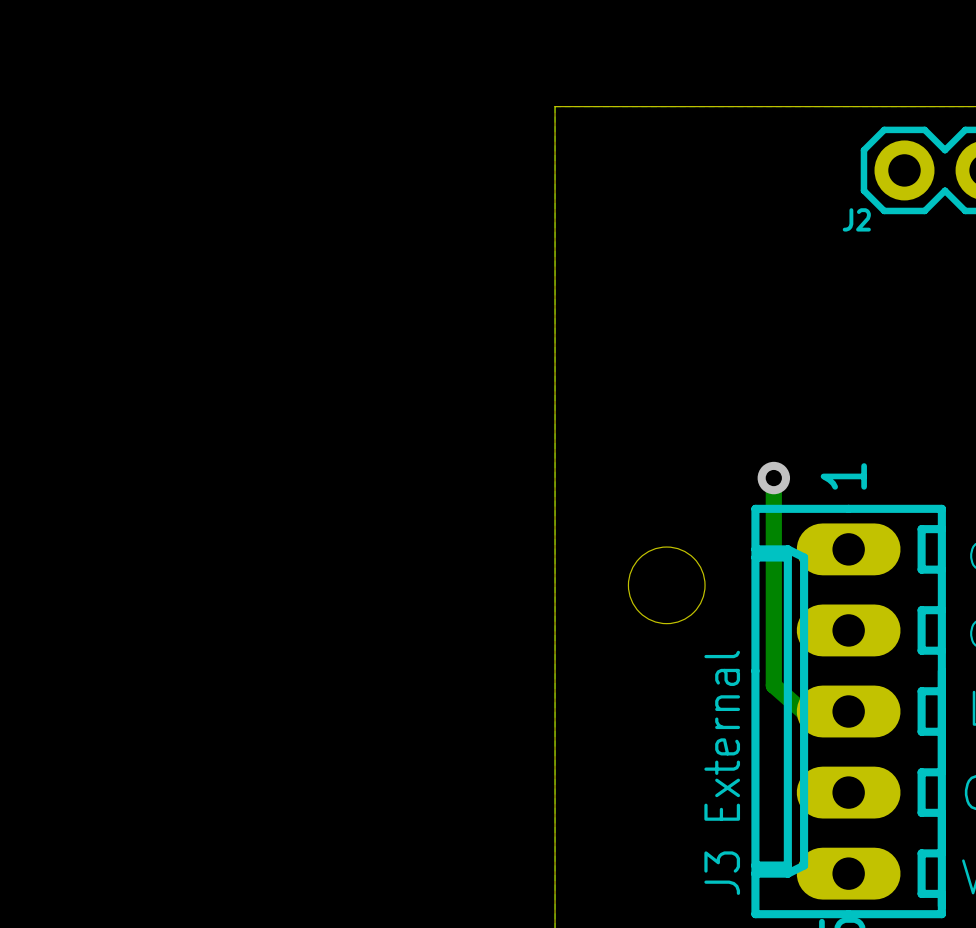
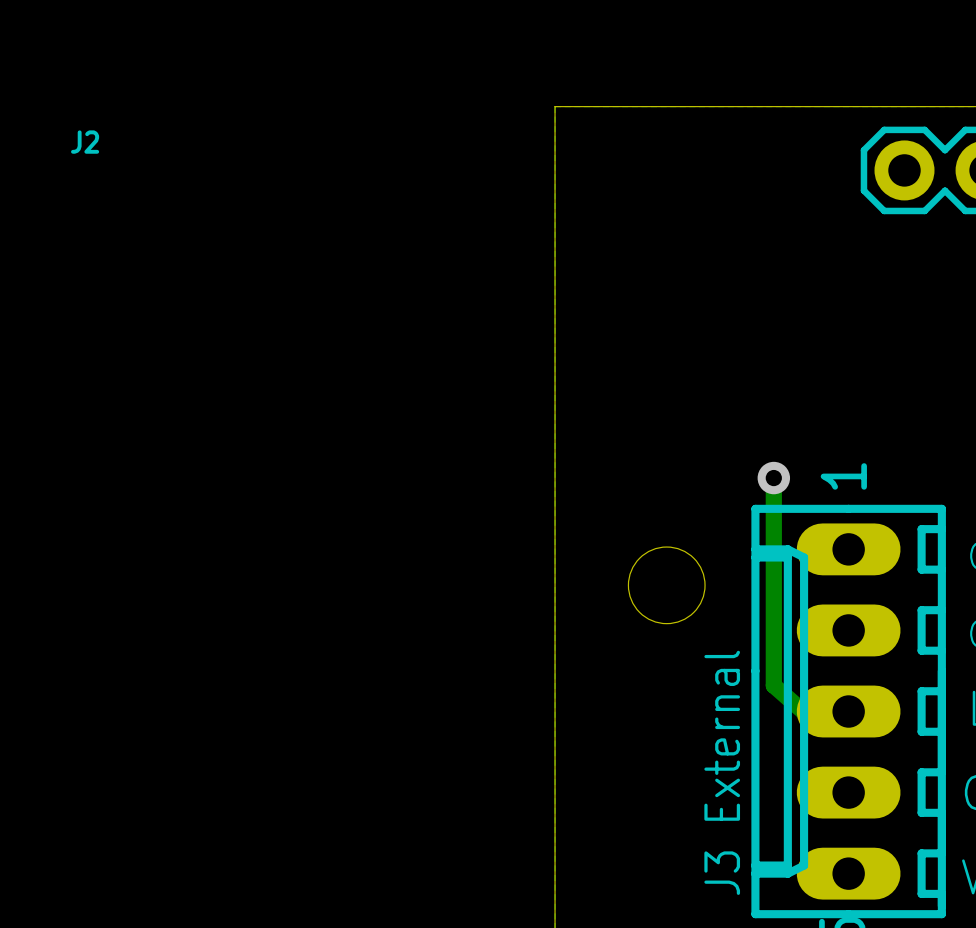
J2 name position: J2 (856, 219) -> J2 (85, 142)

